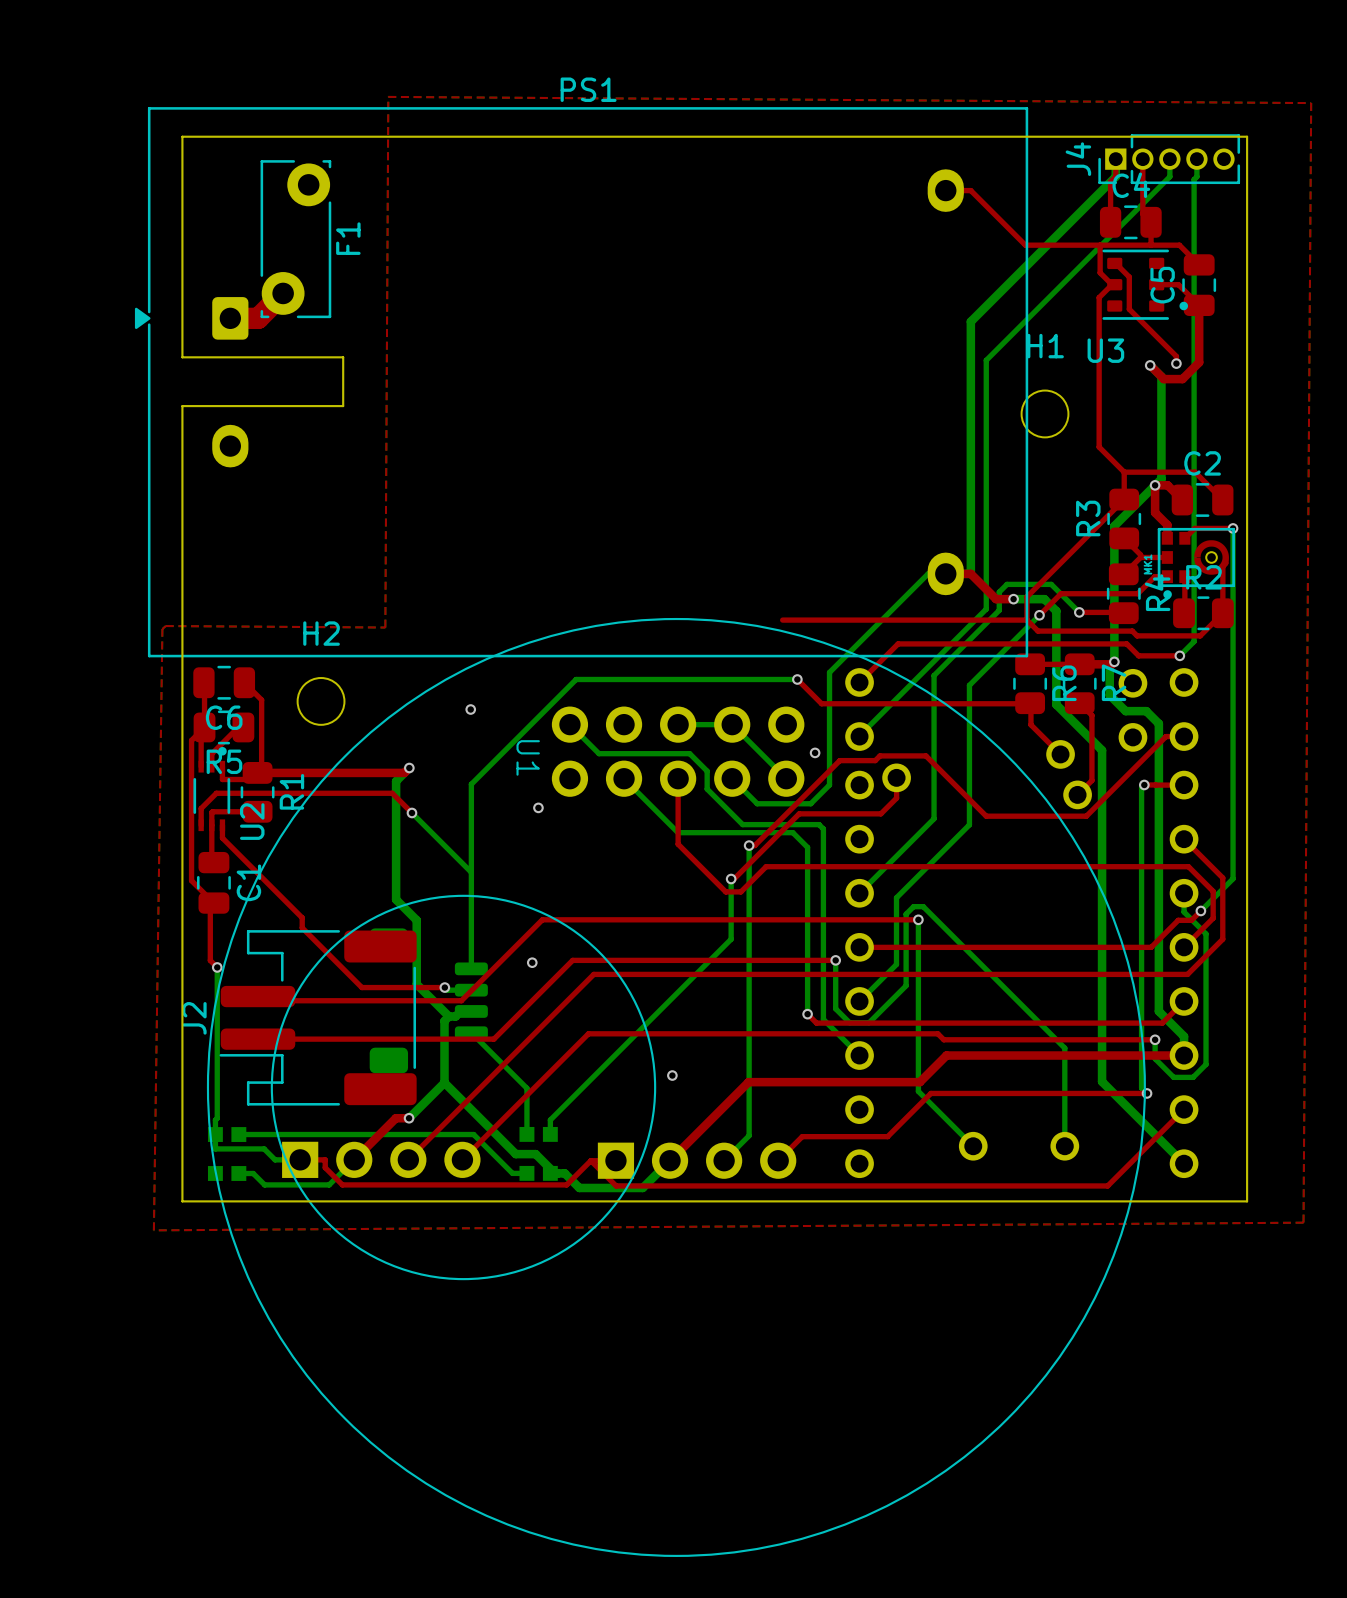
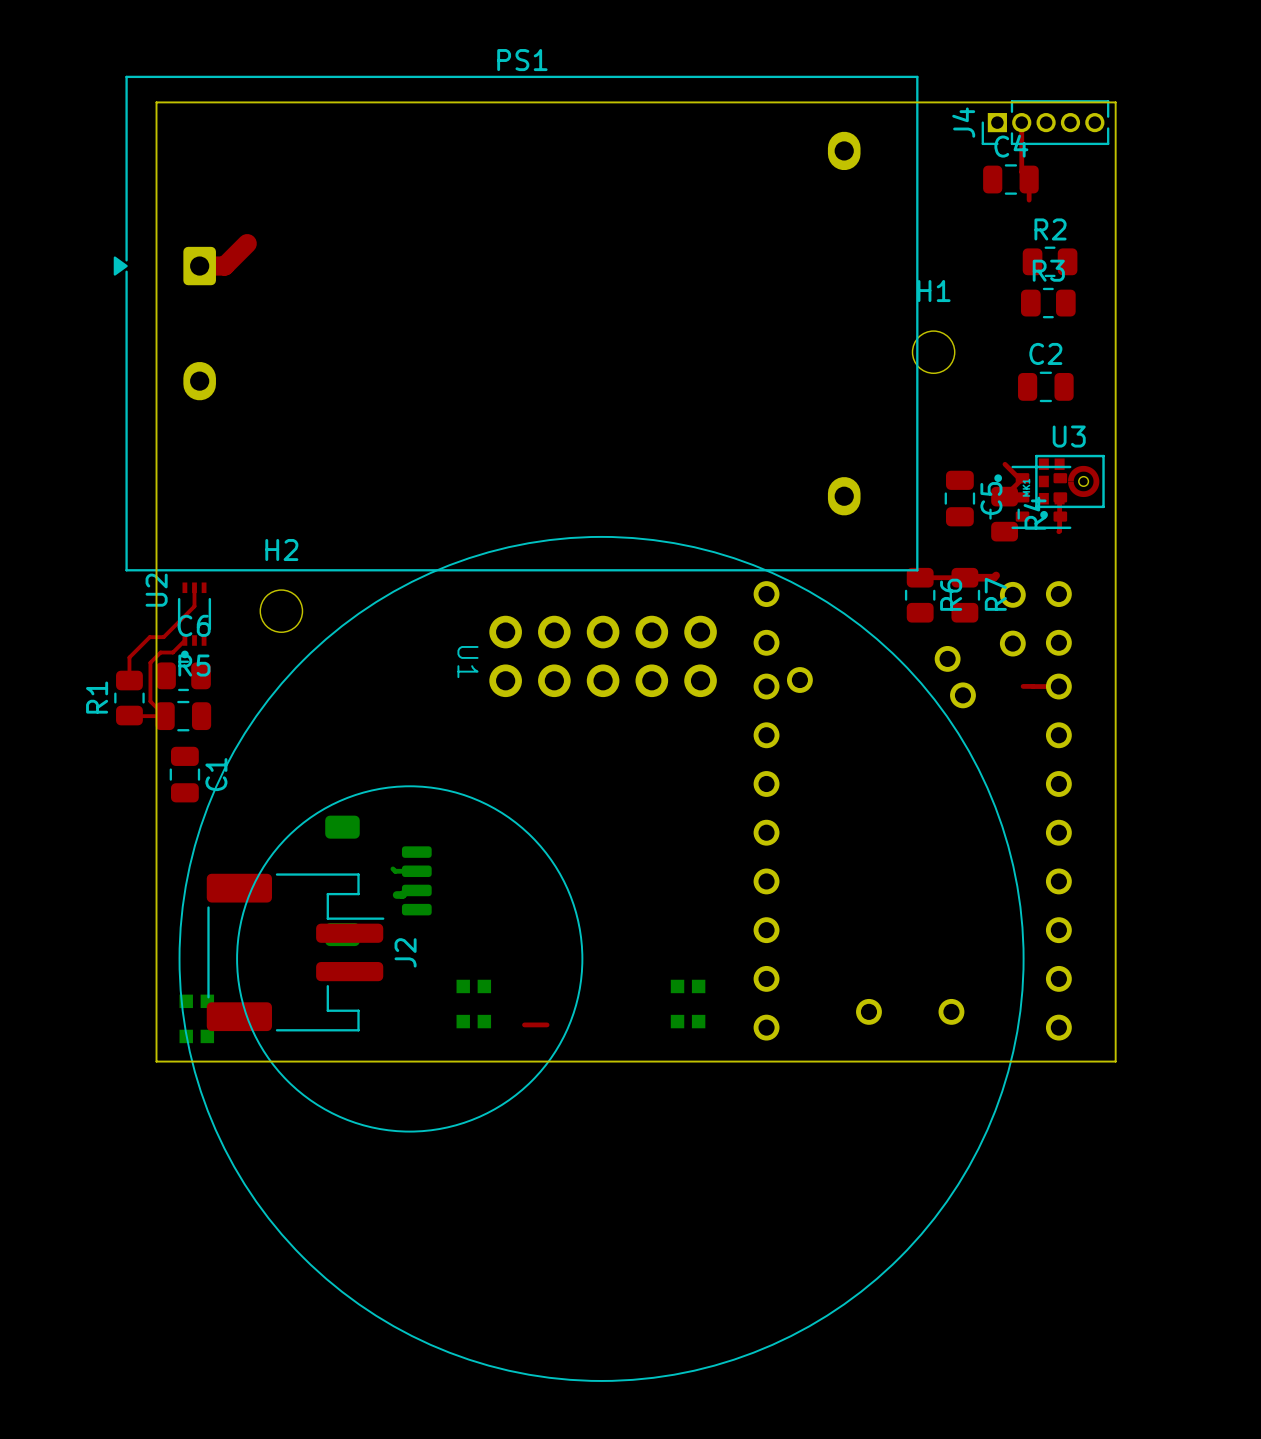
top zone outline: (388, 96) (385, 627) (165, 626) (162, 629) (153, 1230) (1303, 1222) (1311, 103) (388, 96) -> none
top track: (1115, 159) (1115, 176) (1110, 181) (1110, 222) -> none
bottom track: (1115, 159) (1115, 176) (970, 321) (970, 573) (928, 573) (829, 672) (829, 785) (810, 803) (757, 803) (732, 778) (738, 778) -> none
bottom track: (1169, 159) (1169, 176) (986, 360) (986, 609) (859, 736) -> none
bottom track: (1196, 159) (1196, 176) (1194, 179) (1194, 641) (1179, 655) -> none
top track: (945, 190) (970, 190) (1025, 245) (1179, 245) (1199, 264) -> none
F1: (295, 239) -> none
top track: (1100, 245) (1100, 272) (1112, 284) -> none
top track: (1114, 263) (1129, 277) (1129, 309) (1176, 356) (1176, 363) -> none
top track: (1112, 284) (1099, 297) (1099, 447) (1124, 472) -> none
U3 rotation: 0° (1145, 284) -> 180° (1032, 497)
U3 position: (1145, 284) -> (1032, 497)
top track: (1156, 284) (1178, 284) (1199, 305) (1199, 362) (1182, 379) (1163, 379) (1150, 365) -> none
C5 name position: C5 (1162, 285) -> C5 (991, 498)
C5 position: (1199, 285) -> (959, 498)
board edge: (182, 357) (343, 357) (343, 406) (182, 406) -> (156, 301) (156, 345)
via: (1176, 363) -> none
bottom track: (1150, 364) (1161, 376) (1161, 479) (1114, 526) (1114, 661) (1109, 666) (1109, 695) (1125, 711) (1146, 711) (1158, 723) (1158, 1011) (1184, 1036) (1184, 1055) -> none
via: (1150, 365) -> none
top track: (1124, 472) (1195, 472) (1222, 499) -> none
top track: (1124, 472) (1124, 499) (1026, 596) (1026, 620) -> none
via: (1155, 485) -> none
top track: (1182, 499) (1167, 485) (1155, 485) (1155, 512) (1167, 524) (1167, 538) -> none
C2 position: (1202, 499) -> (1045, 386)
R3 rotation: 0° (1124, 518) -> 90° clockwise (1048, 303)
R3 position: (1124, 518) -> (1048, 303)
top track: (1233, 528) (1194, 528) (1184, 538) -> none
bottom track: (1233, 528) (1233, 878) (1200, 910) -> none
via: (1233, 528) -> none
top track: (1140, 557) (1167, 557) -> none
top track: (1225, 557) (1225, 563) (1222, 566) (1222, 613) (1200, 635) (1137, 635) (1132, 631) (1037, 631) (1026, 620) -> none
top track: (945, 573) (970, 573) (996, 599) (1013, 599) -> none
top track: (1167, 576) (1154, 576) (1137, 593) (1061, 593) (1039, 615) -> none
bottom track: (1013, 599) (1044, 599) (1056, 611) (1056, 704) (1102, 750) (1102, 1081) (1184, 1163) -> none
via: (1013, 599) -> none
top track: (1079, 612) (1123, 613) -> none
bottom track: (1079, 612) (1051, 584) (1007, 584) (999, 592) (999, 610) (934, 675) (934, 818) (859, 893) -> none
via: (1079, 612) -> none
R2 position: (1203, 613) -> (1050, 261)
bottom track: (1039, 615) (969, 685) (969, 824) (896, 897) (896, 964) (859, 1001) -> none
via: (1039, 615) -> none
top track: (782, 620) (1026, 620) -> none
top track: (1179, 655) (1138, 655) (1126, 643) (898, 643) (859, 682) -> none
via: (1179, 655) -> none
via: (1114, 661) -> none
top track: none -> (194, 587) (194, 606) (163, 637) (149, 637) (129, 657) (129, 680)
top track: (797, 679) (821, 703) (1030, 703) (1030, 724) (1060, 754) -> none
bottom track: (797, 679) (576, 679) (471, 784) (471, 968) -> none
via: (797, 679) -> none
top track: (203, 682) (204, 727) (191, 740) (191, 880) (213, 903) (210, 906) (210, 960) (217, 967) -> none
C6 position: (224, 682) -> (183, 716)
top track: (244, 682) (261, 699) (261, 768) (251, 779) (222, 779) (222, 766) -> none
top track: (1079, 703) (1091, 715) (1091, 780) (1077, 794) -> none
via: (470, 709) -> none
bottom track: (569, 724) (599, 753) (689, 753) (707, 771) (707, 789) (742, 824) (819, 824) (823, 828) (823, 1019) (859, 1055) -> none
bottom track: (678, 724) (732, 724) (786, 778) -> none
R5 position: (223, 727) -> (183, 675)
top track: (243, 727) (238, 727) (211, 753) (211, 766) -> none
top track: (201, 730) (201, 766) -> none
top track: none -> (184, 640) (172, 652) (160, 652) (150, 662) (150, 701) (165, 716) (129, 715)
top track: (1184, 736) (1166, 736) (1086, 816) (986, 816) (925, 755) (879, 755) (875, 760) (839, 760) (754, 845) (749, 845) -> none
via: (815, 752) -> none
top track: (409, 768) (404, 772) (257, 772) -> none
bottom track: (409, 768) (396, 781) (396, 899) (416, 920) (416, 984) (448, 1016) (444, 1020) (444, 1082) -> none
via: (409, 768) -> none
top track: (896, 777) (896, 798) (880, 813) (799, 813) (734, 879) (731, 879) -> none
bottom track: (624, 778) (678, 832) (792, 832) (807, 847) (807, 1014) -> none
top track: (678, 778) (678, 844) (725, 891) (740, 891) (766, 866) (1188, 866) (1213, 891) (1213, 918) (1184, 947) -> none
bottom track: (1144, 784) (1141, 787) (1141, 1087) (1147, 1093) -> none
via: (1144, 784) -> none
U2 rotation: 0° (211, 789) -> 180° (194, 620)
U2 position: (211, 789) -> (194, 620)
R1 name position: R1 (291, 791) -> R1 (97, 697)
R1 position: (257, 792) -> (129, 698)
via: (538, 807) -> none
top track: (257, 811) (211, 812) (211, 861) (213, 862) -> none
top track: (411, 812) (392, 793) (216, 793) (201, 808) (201, 825) -> none
bottom track: (411, 812) (471, 872) -> none
via: (411, 812) -> none
top track: (222, 825) (222, 838) (302, 917) (302, 927) (361, 987) (444, 987) -> none
top track: (1184, 839) (1222, 877) (1222, 939) (1187, 974) (593, 974) (408, 1159) -> none
bottom track: (749, 845) (749, 1135) (724, 1160) -> none
via: (749, 845) -> none
bottom track: (731, 879) (731, 939) (550, 1120) (550, 1134) -> none
via: (731, 879) -> none
bottom track: (1184, 893) (1184, 912) (1206, 933) (1206, 1064) (1193, 1077) (1173, 1077) (1155, 1058) (1155, 1039) -> none
top track: (1200, 910) (1191, 920) (1178, 920) (1151, 947) (859, 947) -> none
via: (1200, 910) -> none
top track: (918, 919) (542, 919) (461, 1000) (262, 1000) (258, 996) -> none
bottom track: (918, 919) (918, 1091) (973, 1146) -> none
via: (918, 919) -> none
top track: (835, 960) (572, 960) (493, 1039) (258, 1039) -> none
bottom track: (835, 960) (835, 1008) (849, 1022) (869, 1022) (906, 985) (906, 914) (913, 906) (923, 906) (1064, 1048) (1064, 1146) -> none
via: (835, 960) -> none
via: (532, 962) -> none
bottom track: (217, 967) (217, 1118) (215, 1120) (215, 1148) (264, 1148) (275, 1159) (300, 1159) -> none
via: (217, 967) -> none
via: (444, 987) -> none
top track: (1184, 1001) (1162, 1023) (816, 1023) (807, 1014) -> none
via: (807, 1014) -> none
J2 rotation: 0° (318, 1017) -> 180° (295, 952)
bottom track: (471, 1032) (526, 1088) (526, 1134) -> none
top track: (1155, 1039) (943, 1039) (937, 1033) (588, 1033) (462, 1159) -> none
via: (1155, 1039) -> none
top track: (1184, 1055) (946, 1055) (919, 1082) (748, 1082) (670, 1160) -> none
via: (672, 1075) -> none
bottom track: (444, 1082) (515, 1154) (535, 1154) (554, 1173) -> none
bottom track: (444, 1082) (409, 1118) -> none
top track: (1147, 1093) (930, 1093) (887, 1136) (802, 1136) (778, 1160) -> none
via: (1147, 1093) -> none
top track: (1184, 1109) (1107, 1185) (616, 1185) (590, 1160) (566, 1184) (342, 1184) (325, 1167) (325, 1159) (300, 1159) -> none
top track: (409, 1118) (395, 1118) (354, 1159) -> none
via: (409, 1118) -> none
bottom track: (238, 1134) (473, 1134) (512, 1173) (526, 1173) -> none
part: none -> (688, 1004)
part position: (538, 1153) -> (473, 1004)
bottom track: (354, 1159) (329, 1184) (264, 1184) (253, 1173) (238, 1173) -> none
part: (381, 1159) -> none
bottom track: (670, 1160) (642, 1187) (579, 1187) (564, 1173) (550, 1173) -> none
part: (697, 1160) -> none

